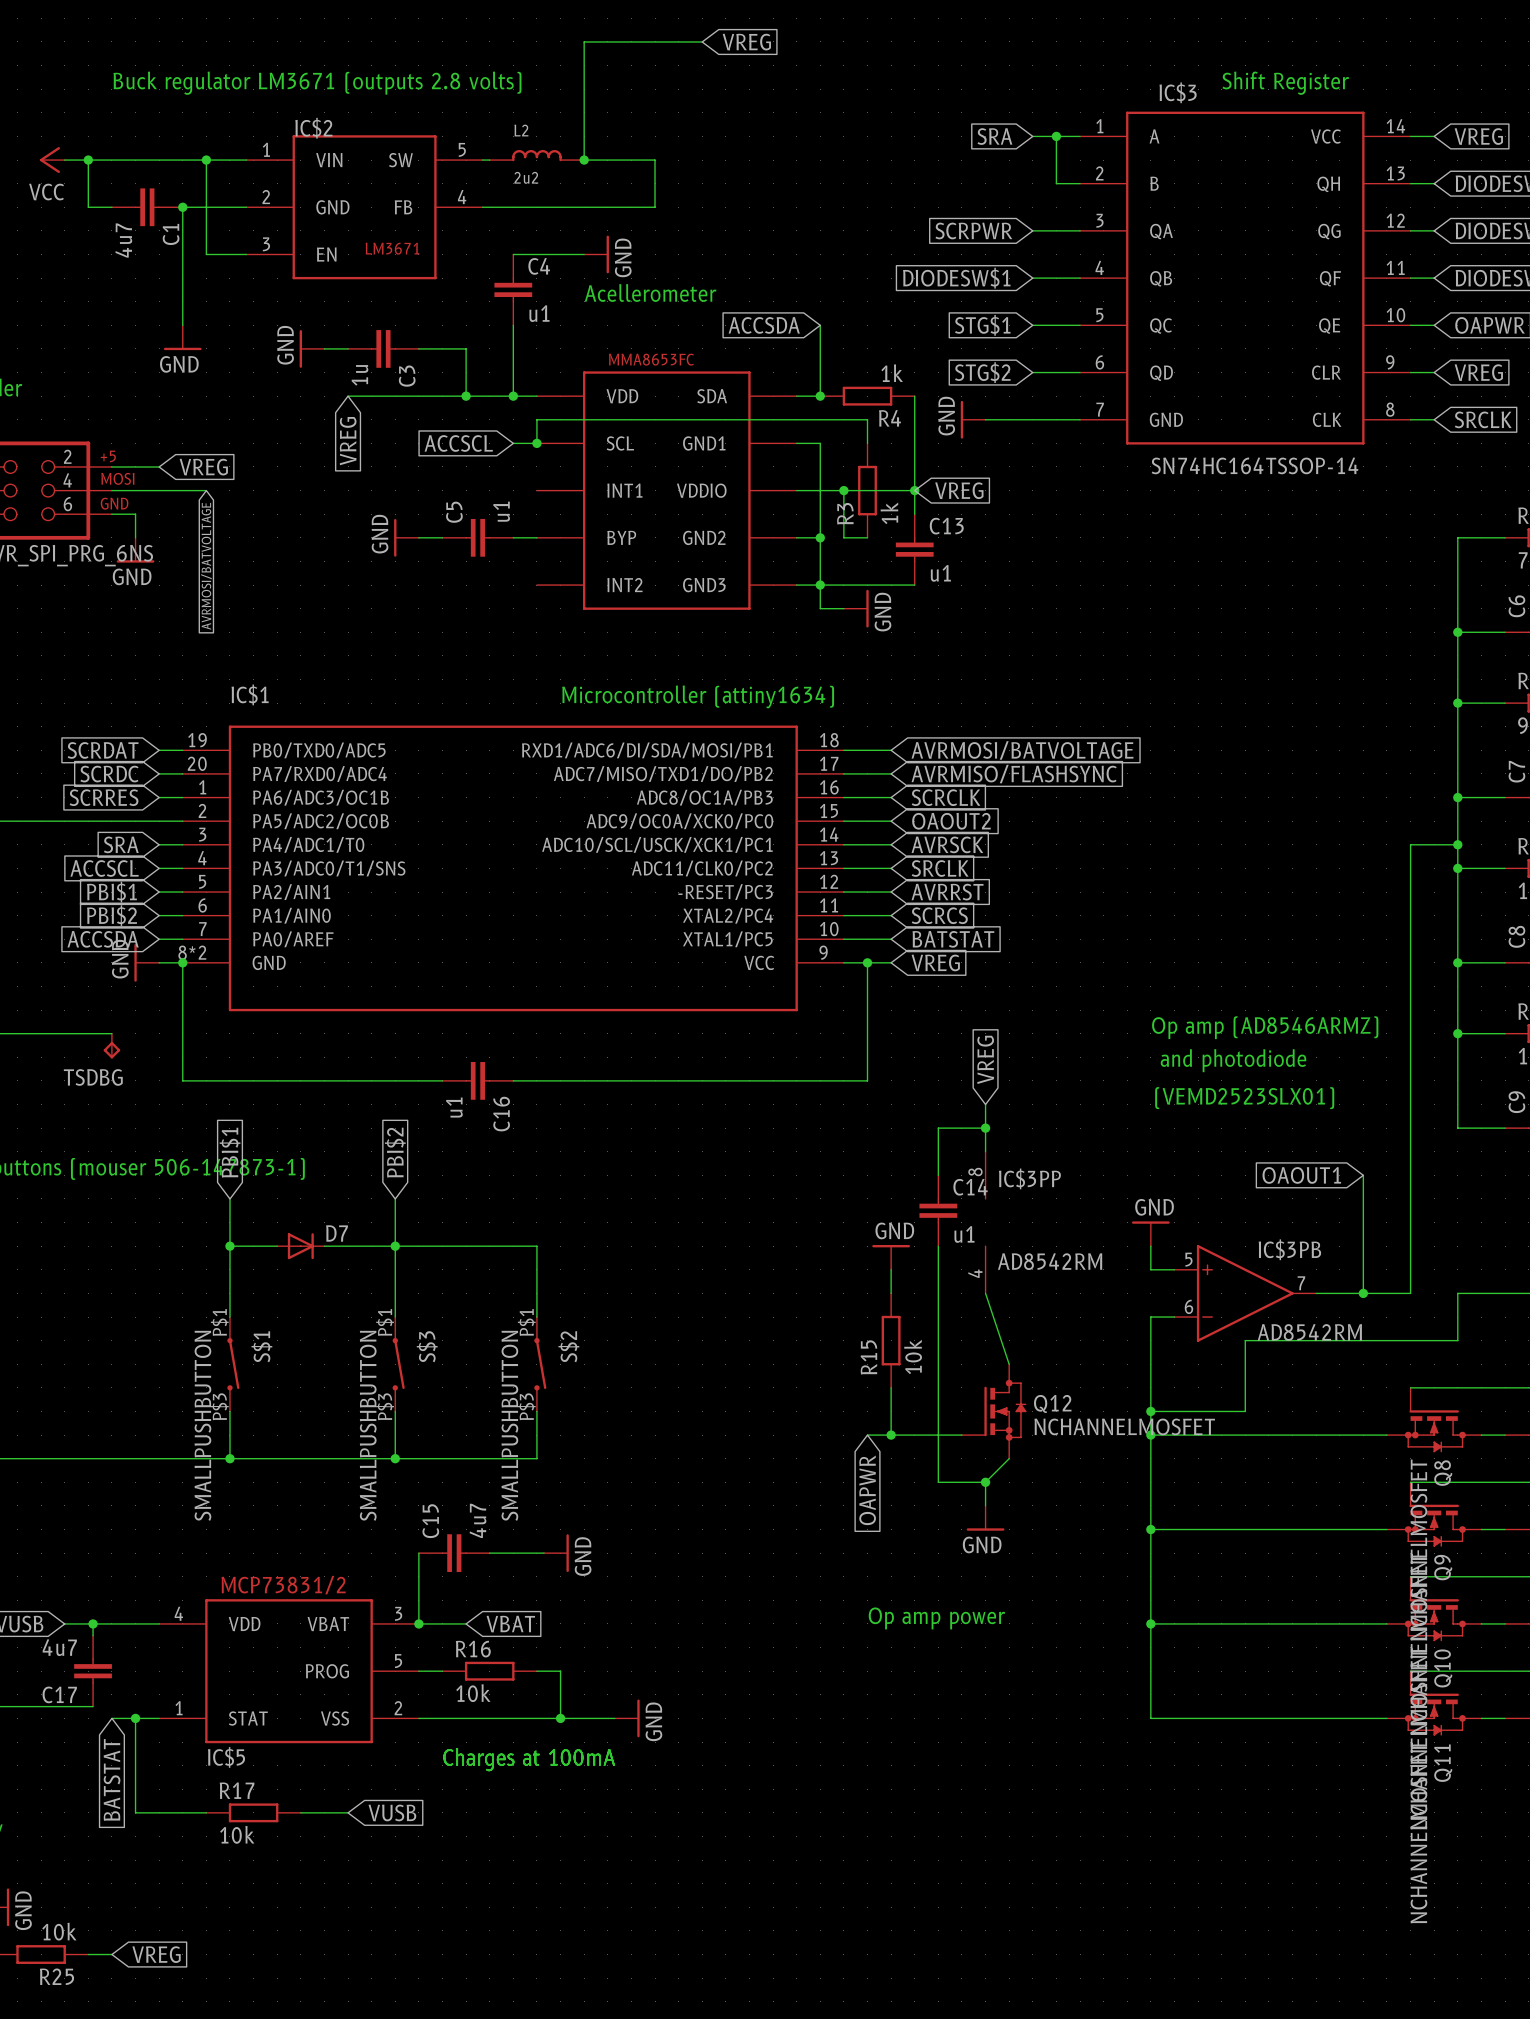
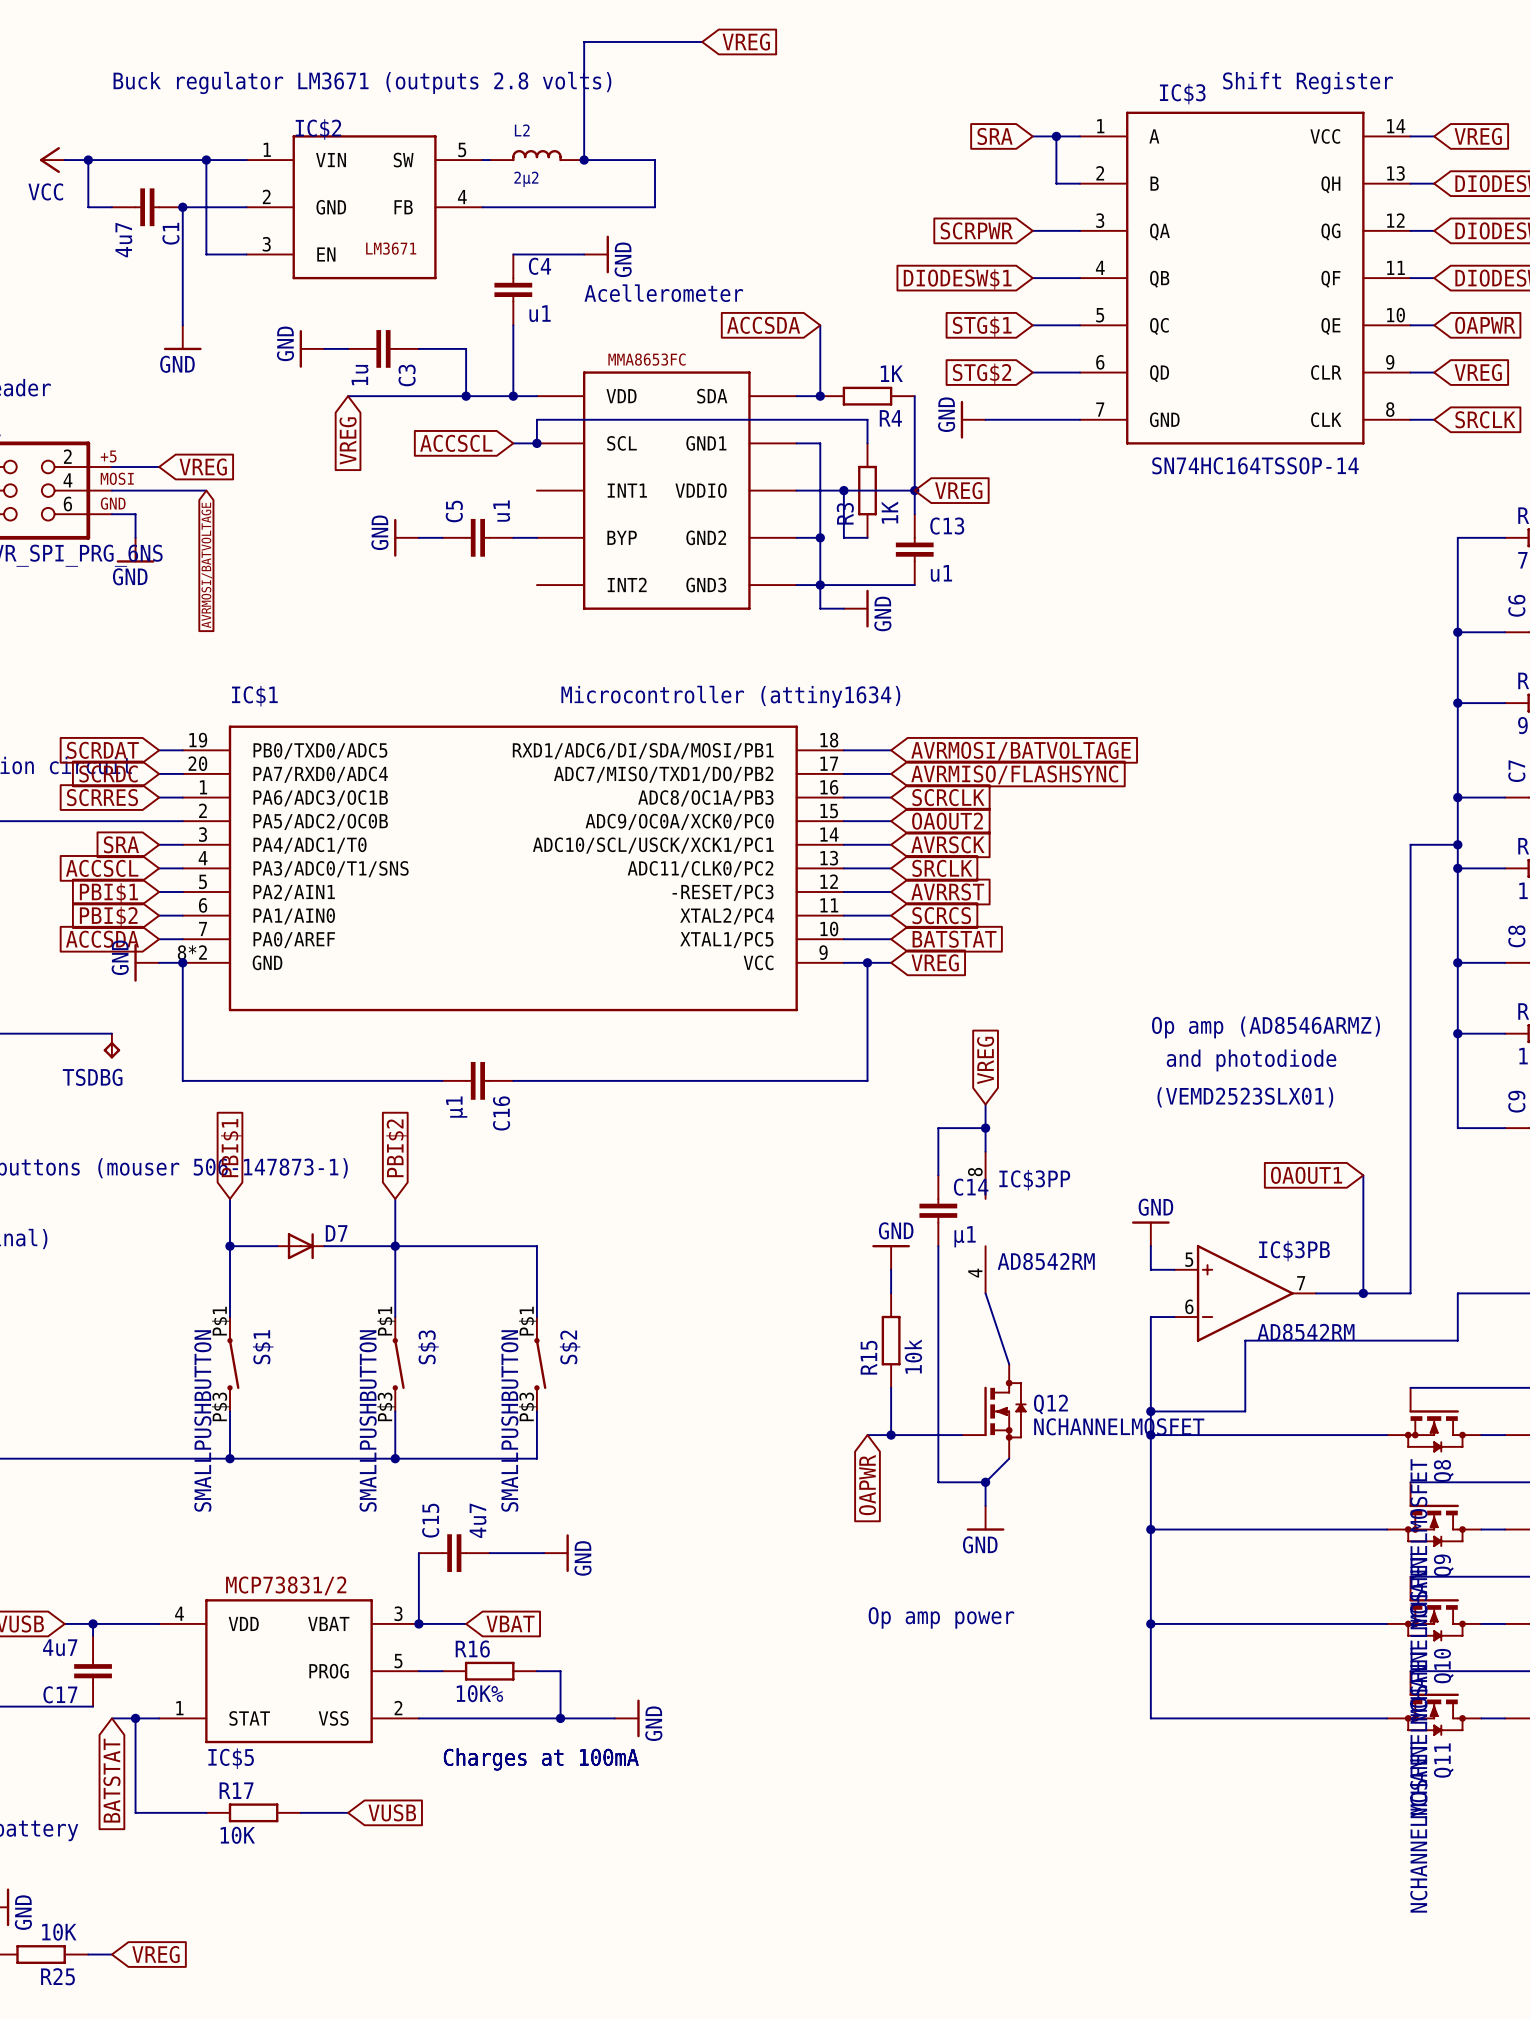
L2 value: 2u2 (526, 177) -> 2µ2 (526, 179)
R4 value: 1k (892, 373) -> 1K (891, 373)
R3 value: 1k (889, 513) -> 1K (889, 512)
C16 value: u1 (454, 1107) -> µ1 (456, 1107)
C14 value: u1 (964, 1234) -> µ1 (965, 1236)
R16 value: 10k (473, 1693) -> 10K% (479, 1693)
R17 value: 10k (237, 1834) -> 10K (237, 1835)
R25 value: 10k (59, 1931) -> 10K (59, 1932)

